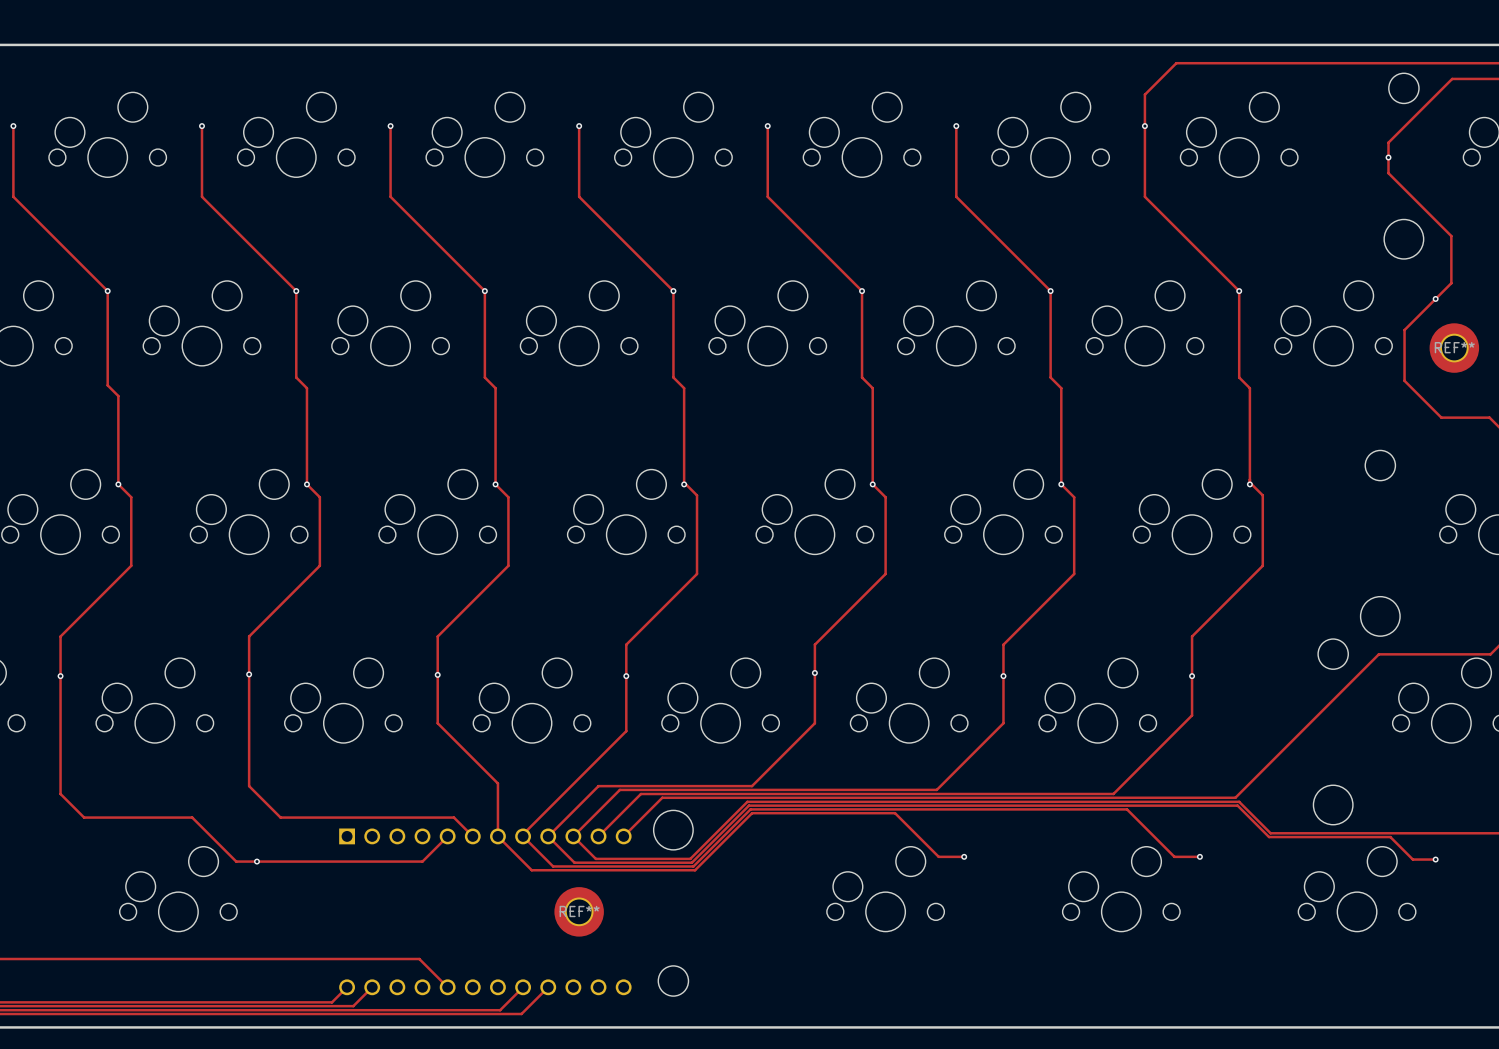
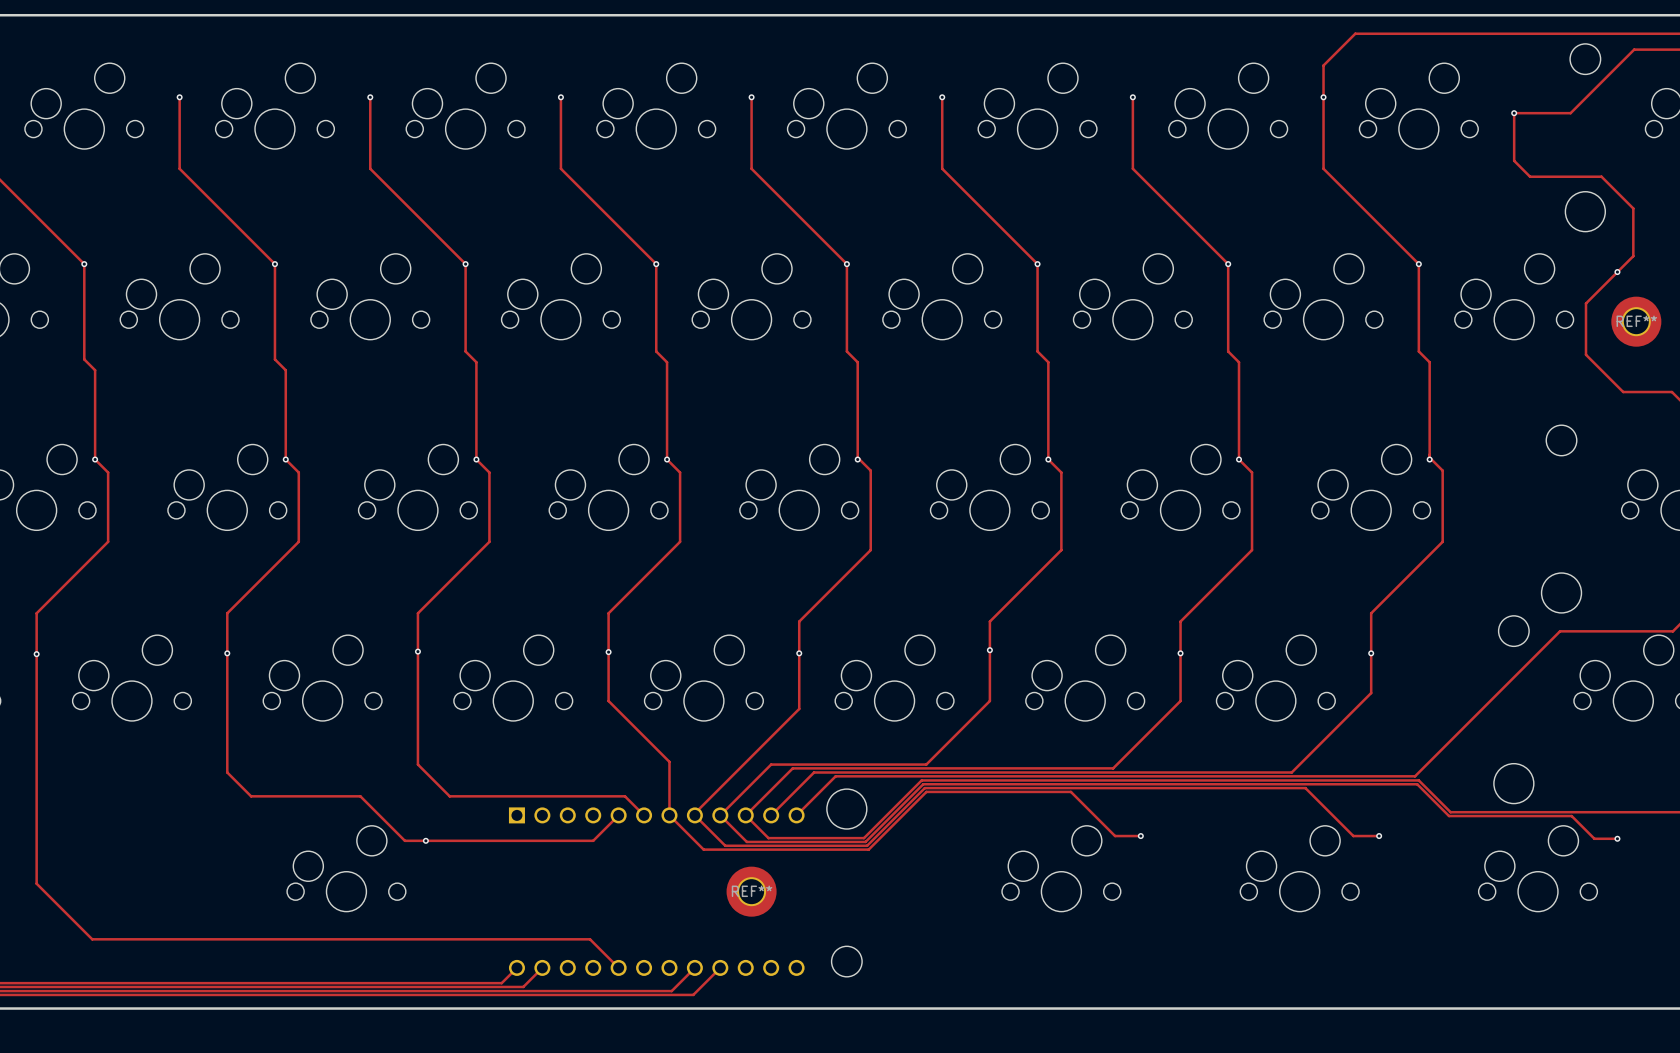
track: (1389, 141) (1388, 173) (1419, 204) -> (1570, 113) (1514, 113) (1514, 160) (1530, 176) (1601, 176)
via position: (1388, 157) -> (1514, 113)

